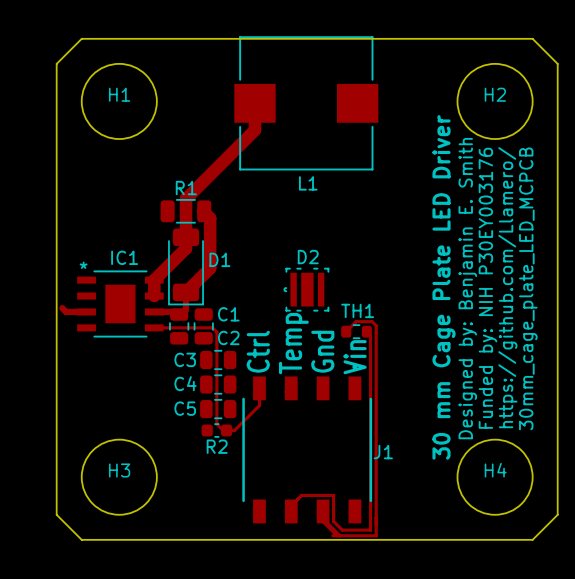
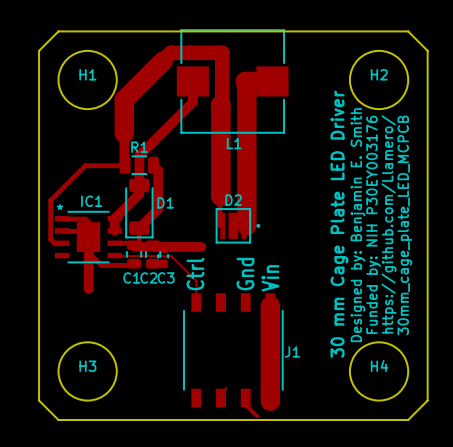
track: none -> (272, 81) (245, 81) (246, 225) (246, 202)
track: none -> (220, 104) (221, 196)
track: none -> (222, 143) (222, 52) (170, 52) (124, 99) (124, 165) (85, 165) (50, 200) (50, 239) (55, 243) (62, 243)
track: none -> (219, 204) (219, 225)
D2 footprint: [283, 267, 330, 312] -> [215, 208, 261, 244]
track: none -> (62, 219) (85, 219) (88, 222) (88, 252) (101, 265) (134, 265)
track: none -> (62, 231) (82, 231) (88, 237) (88, 289)
track: (62, 308) (66, 311) (86, 311) -> none
C1 name position: C1 (228, 314) -> C1 (131, 278)
track: none -> (134, 246) (201, 246)
track: (154, 327) (212, 327) (216, 332) (216, 424) (223, 430) (234, 430) (259, 405) (259, 388) -> none
track: none -> (114, 256) (171, 256) (196, 281) (196, 310)
track: (346, 331) (356, 321) (372, 321) (376, 325) (376, 535) (332, 535) -> none
TH1: (356, 331) -> none
track: (370, 334) (370, 530) (342, 530) (333, 521) (333, 495) (301, 495) (298, 498) -> none
C2 name position: C2 (228, 337) -> C2 (148, 278)
text: Temp (293, 343) -> none
C3 footprint: [200, 350, 237, 370] -> [157, 244, 169, 269]
C3 name position: C3 (185, 359) -> C3 (166, 277)
C4: (218, 384) -> none
track: none -> (270, 305) (270, 401)
C5: (218, 409) -> none
R2: (216, 430) -> none

